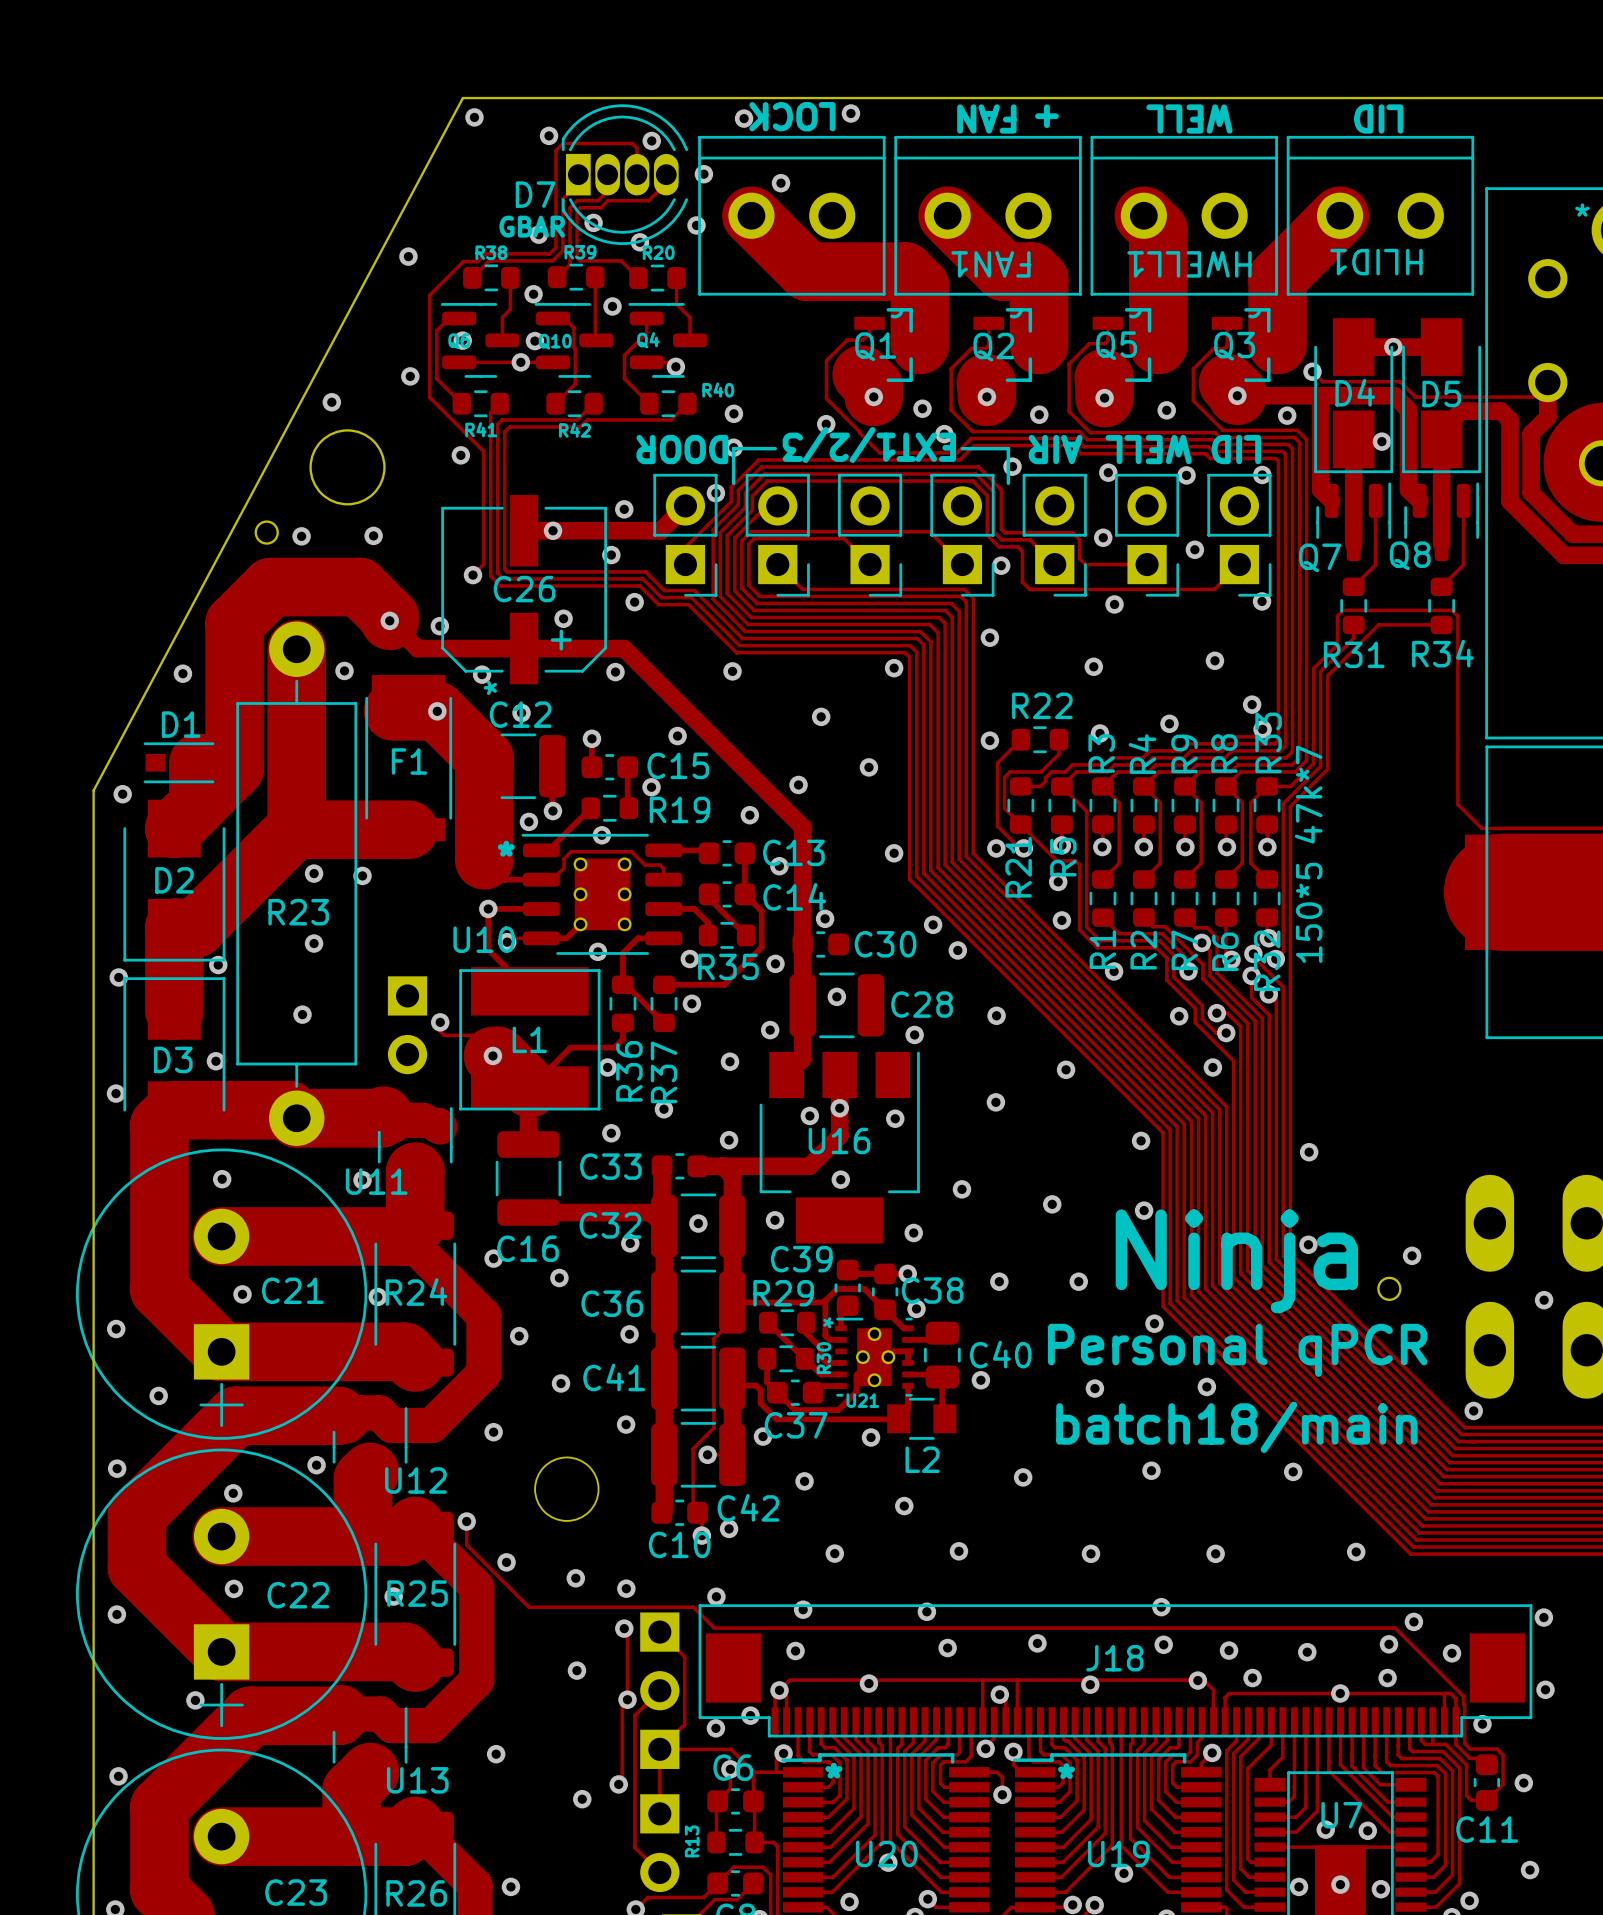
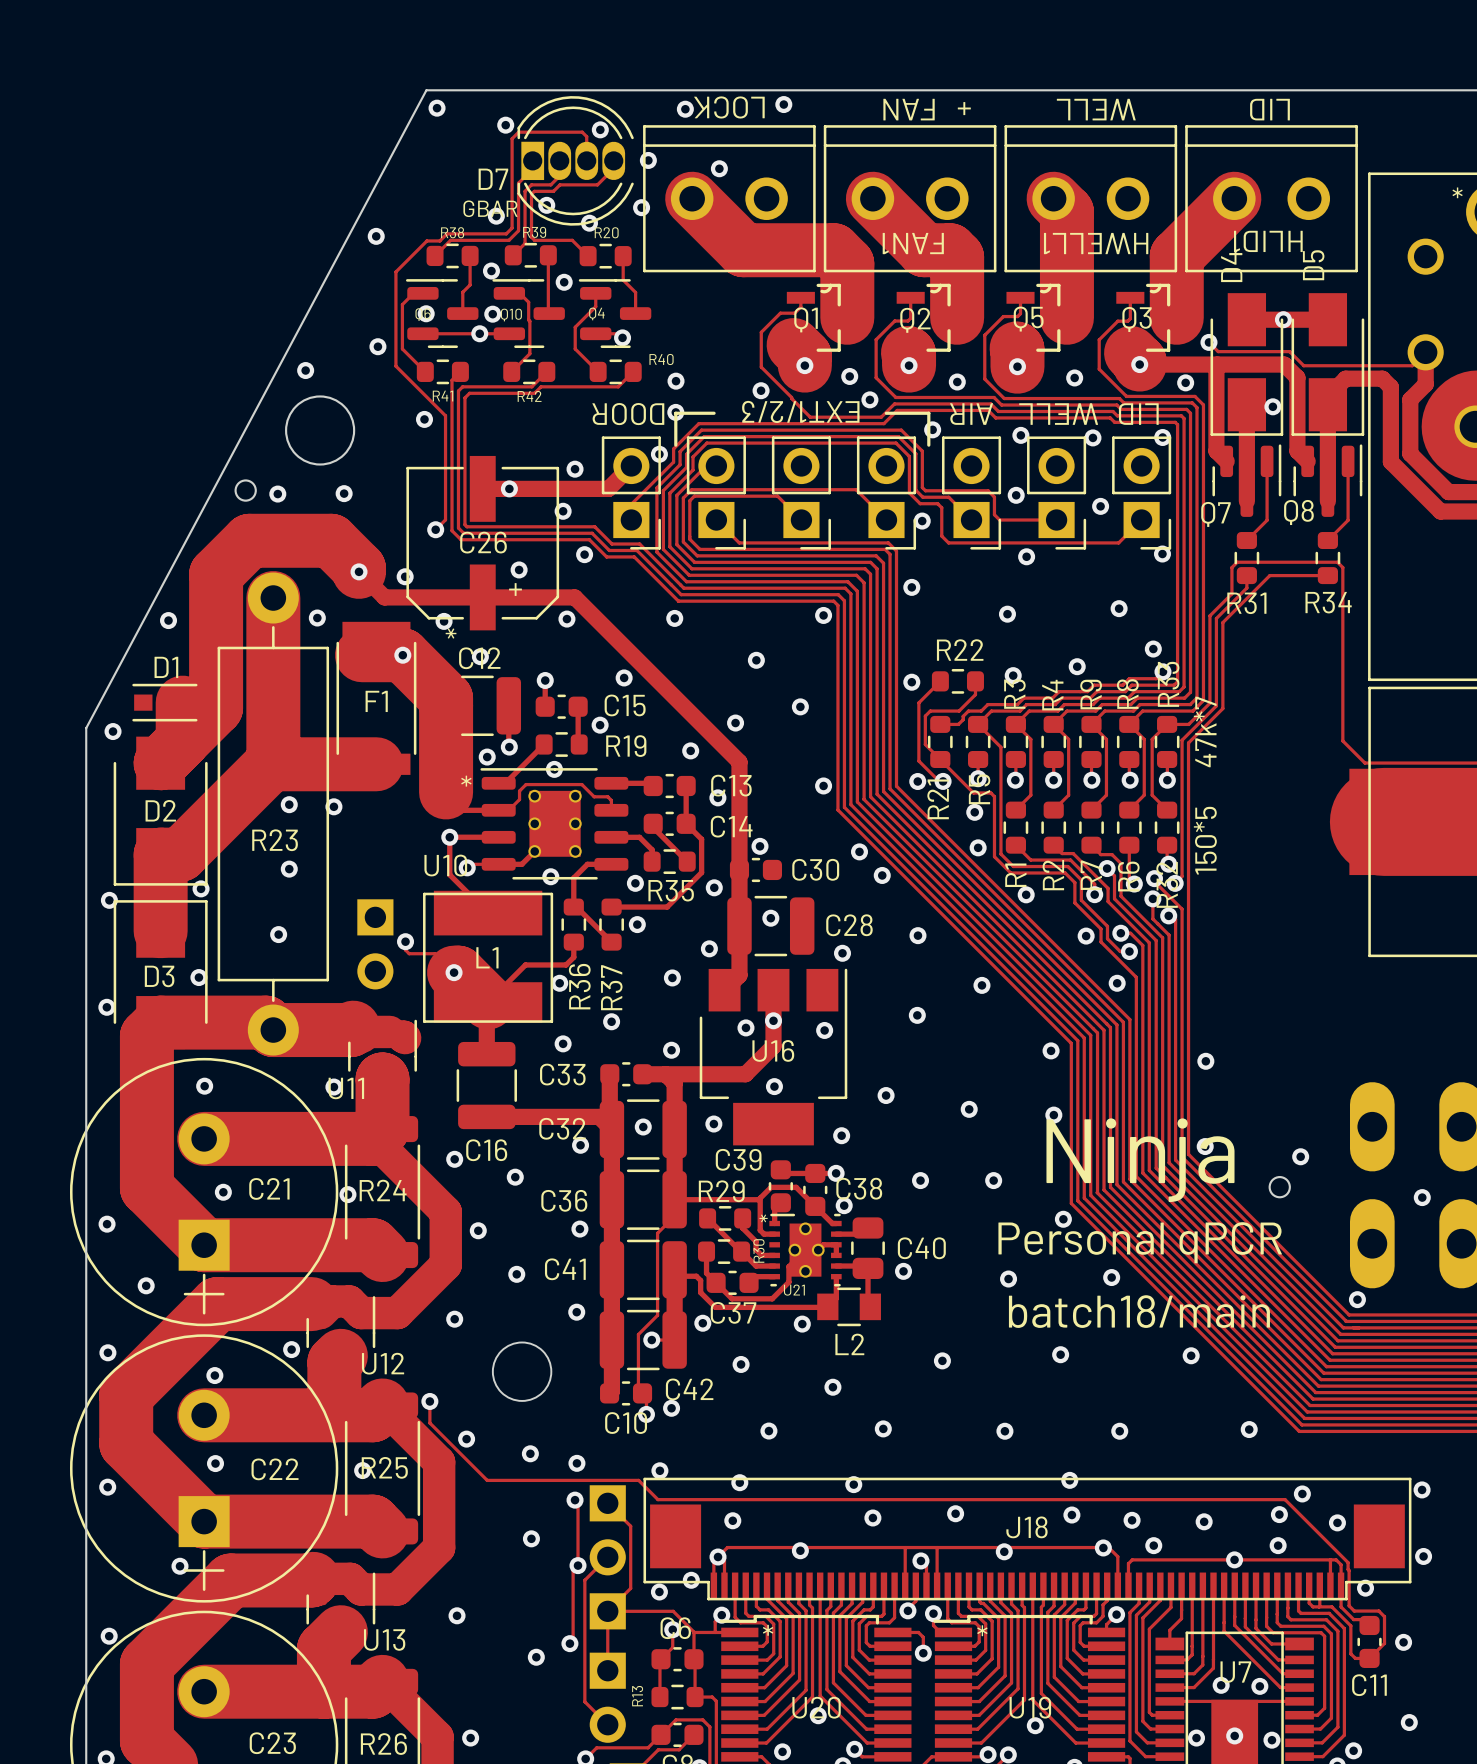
D4 name rotation: 0° (1355, 392) -> 90° counterclockwise (1231, 266)
D4 name position: D4 (1355, 392) -> D4 (1231, 266)
D5 name rotation: 0° (1441, 394) -> 90° counterclockwise (1313, 265)
D5 name position: D5 (1441, 394) -> D5 (1313, 265)

